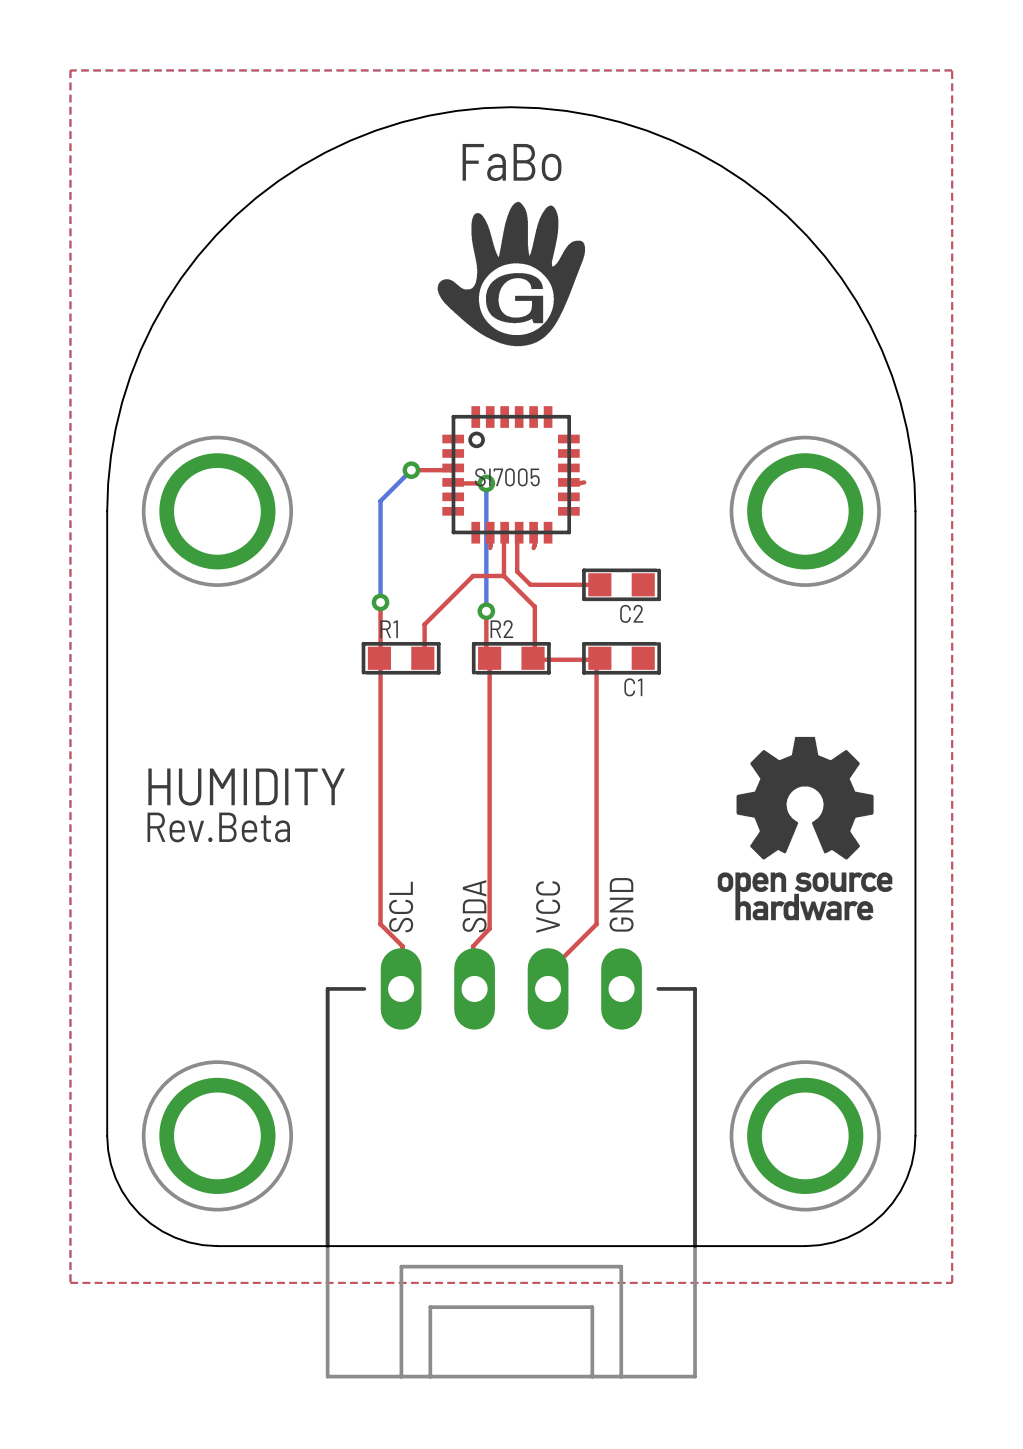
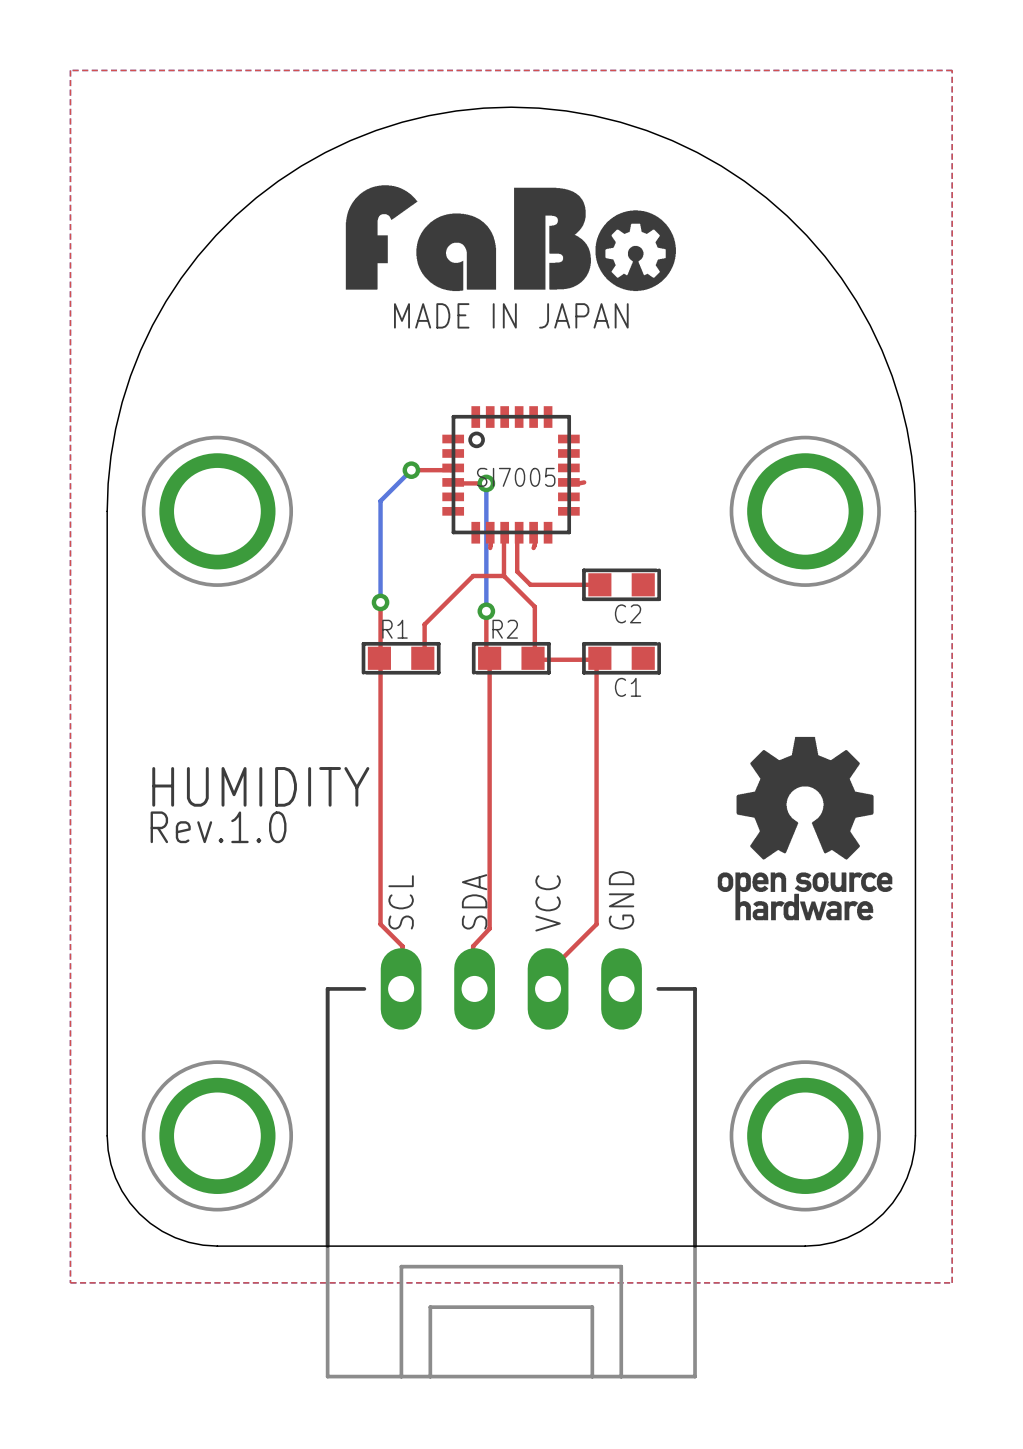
drawing: none -> [345, 185, 676, 292]
drawing: [437, 201, 586, 347] -> none
text: none -> MADE IN JAPAN (511, 315)
text: Rev.Beta (218, 827) -> Rev.1.0 (218, 827)

